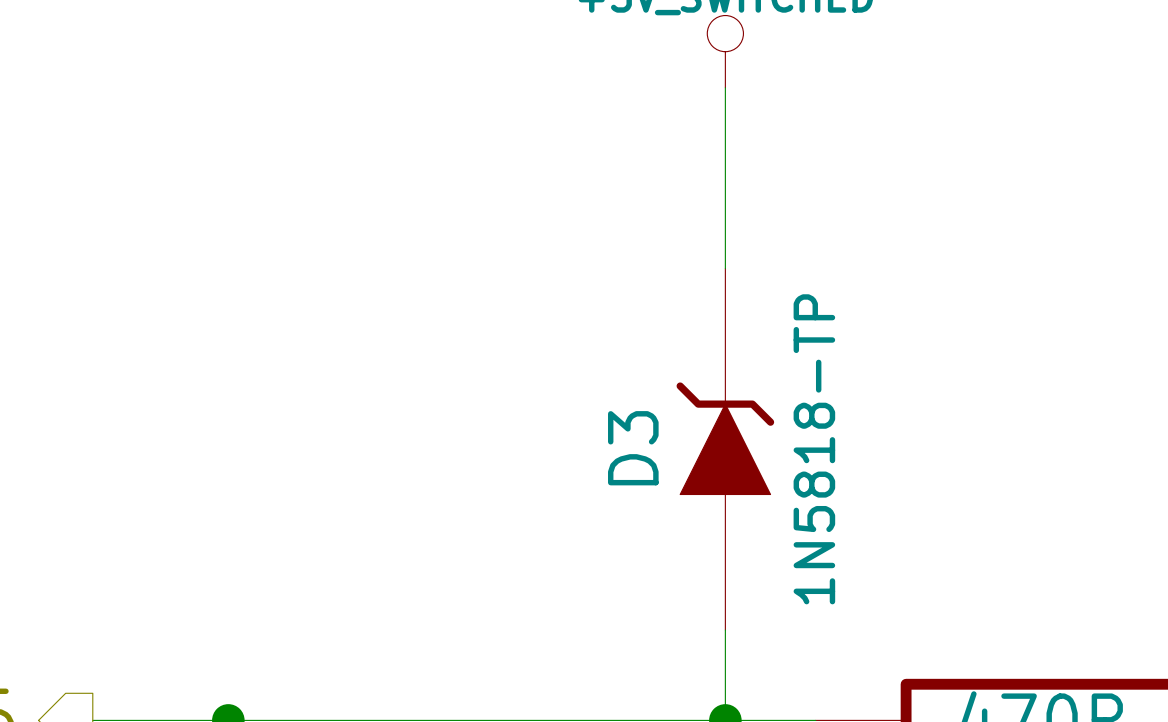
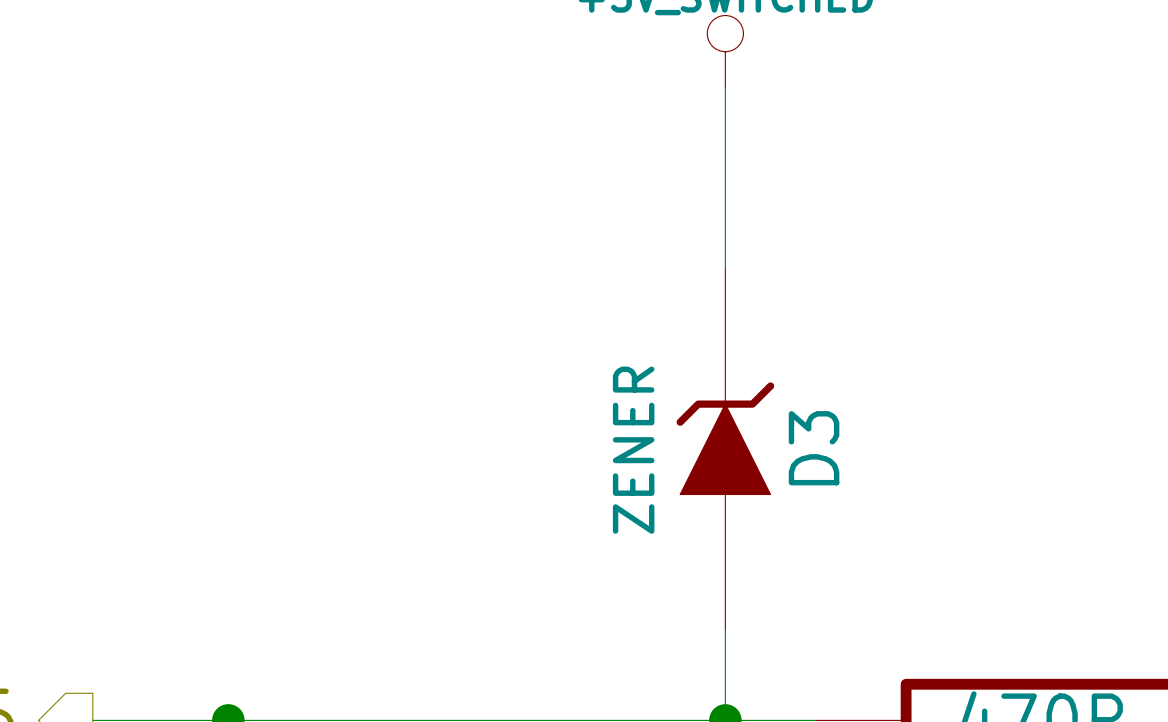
D3 flip: as is (725, 438) -> left-right (725, 438)
D3 value: 1N5818-TP (814, 449) -> ZENER (633, 450)

